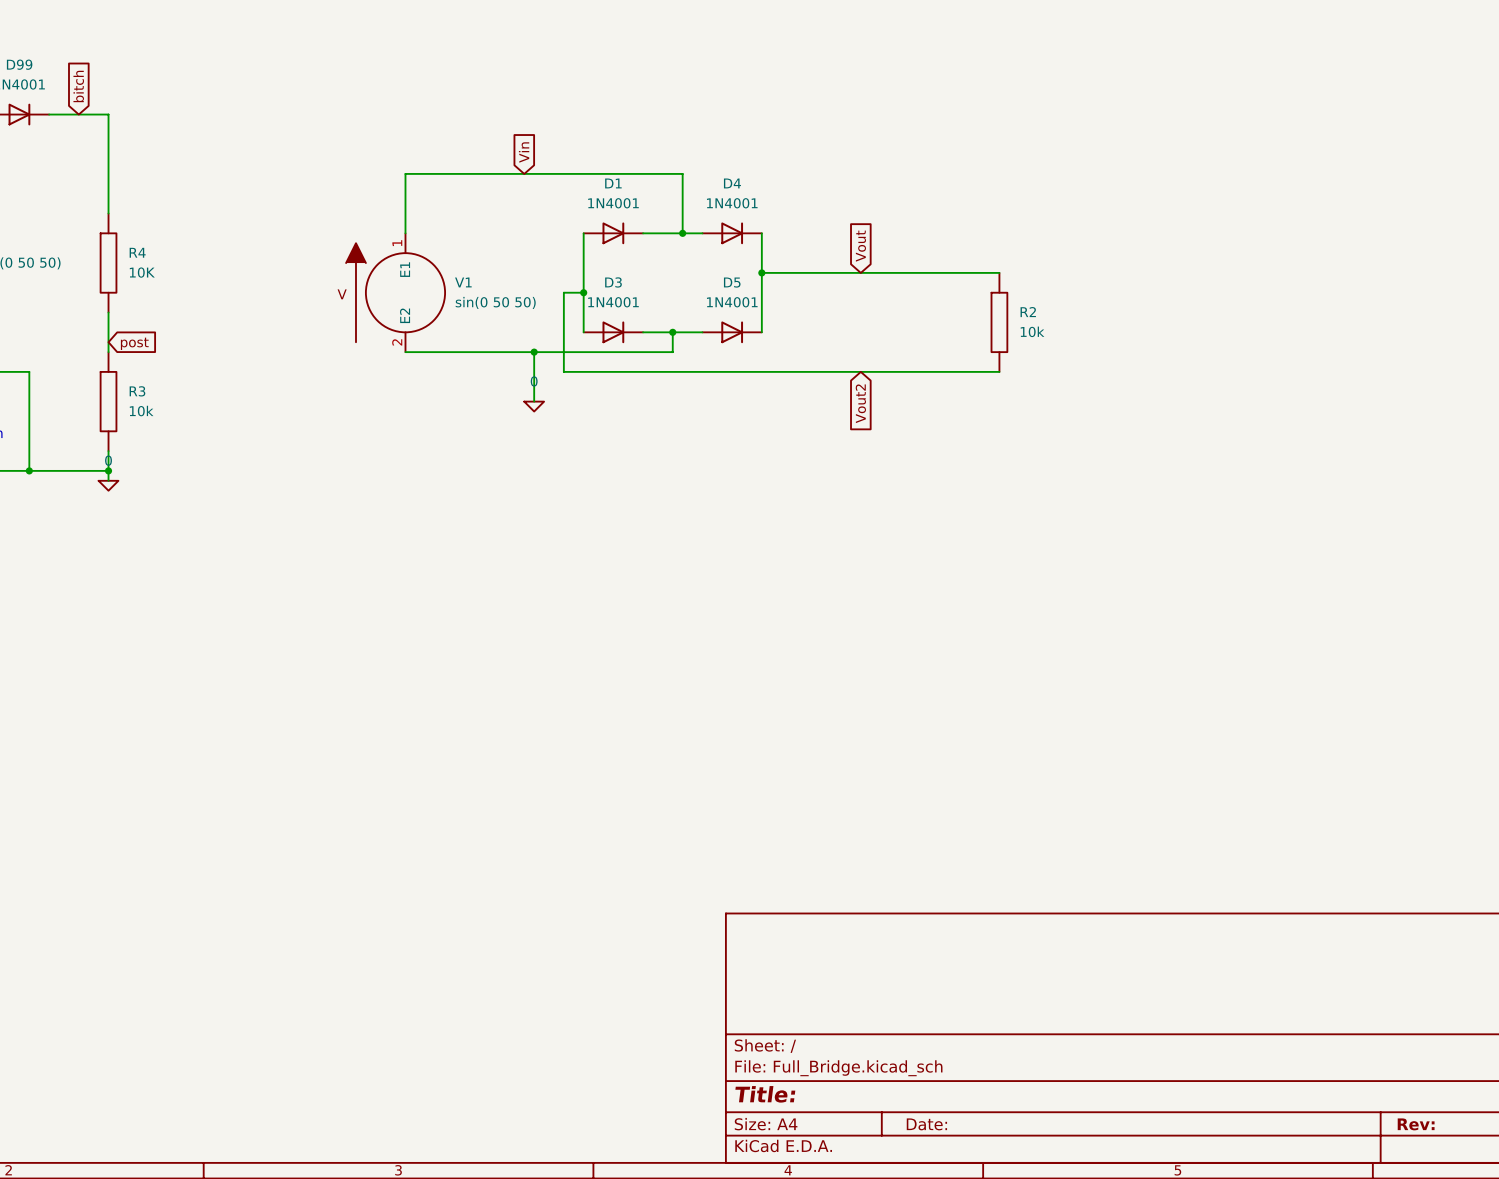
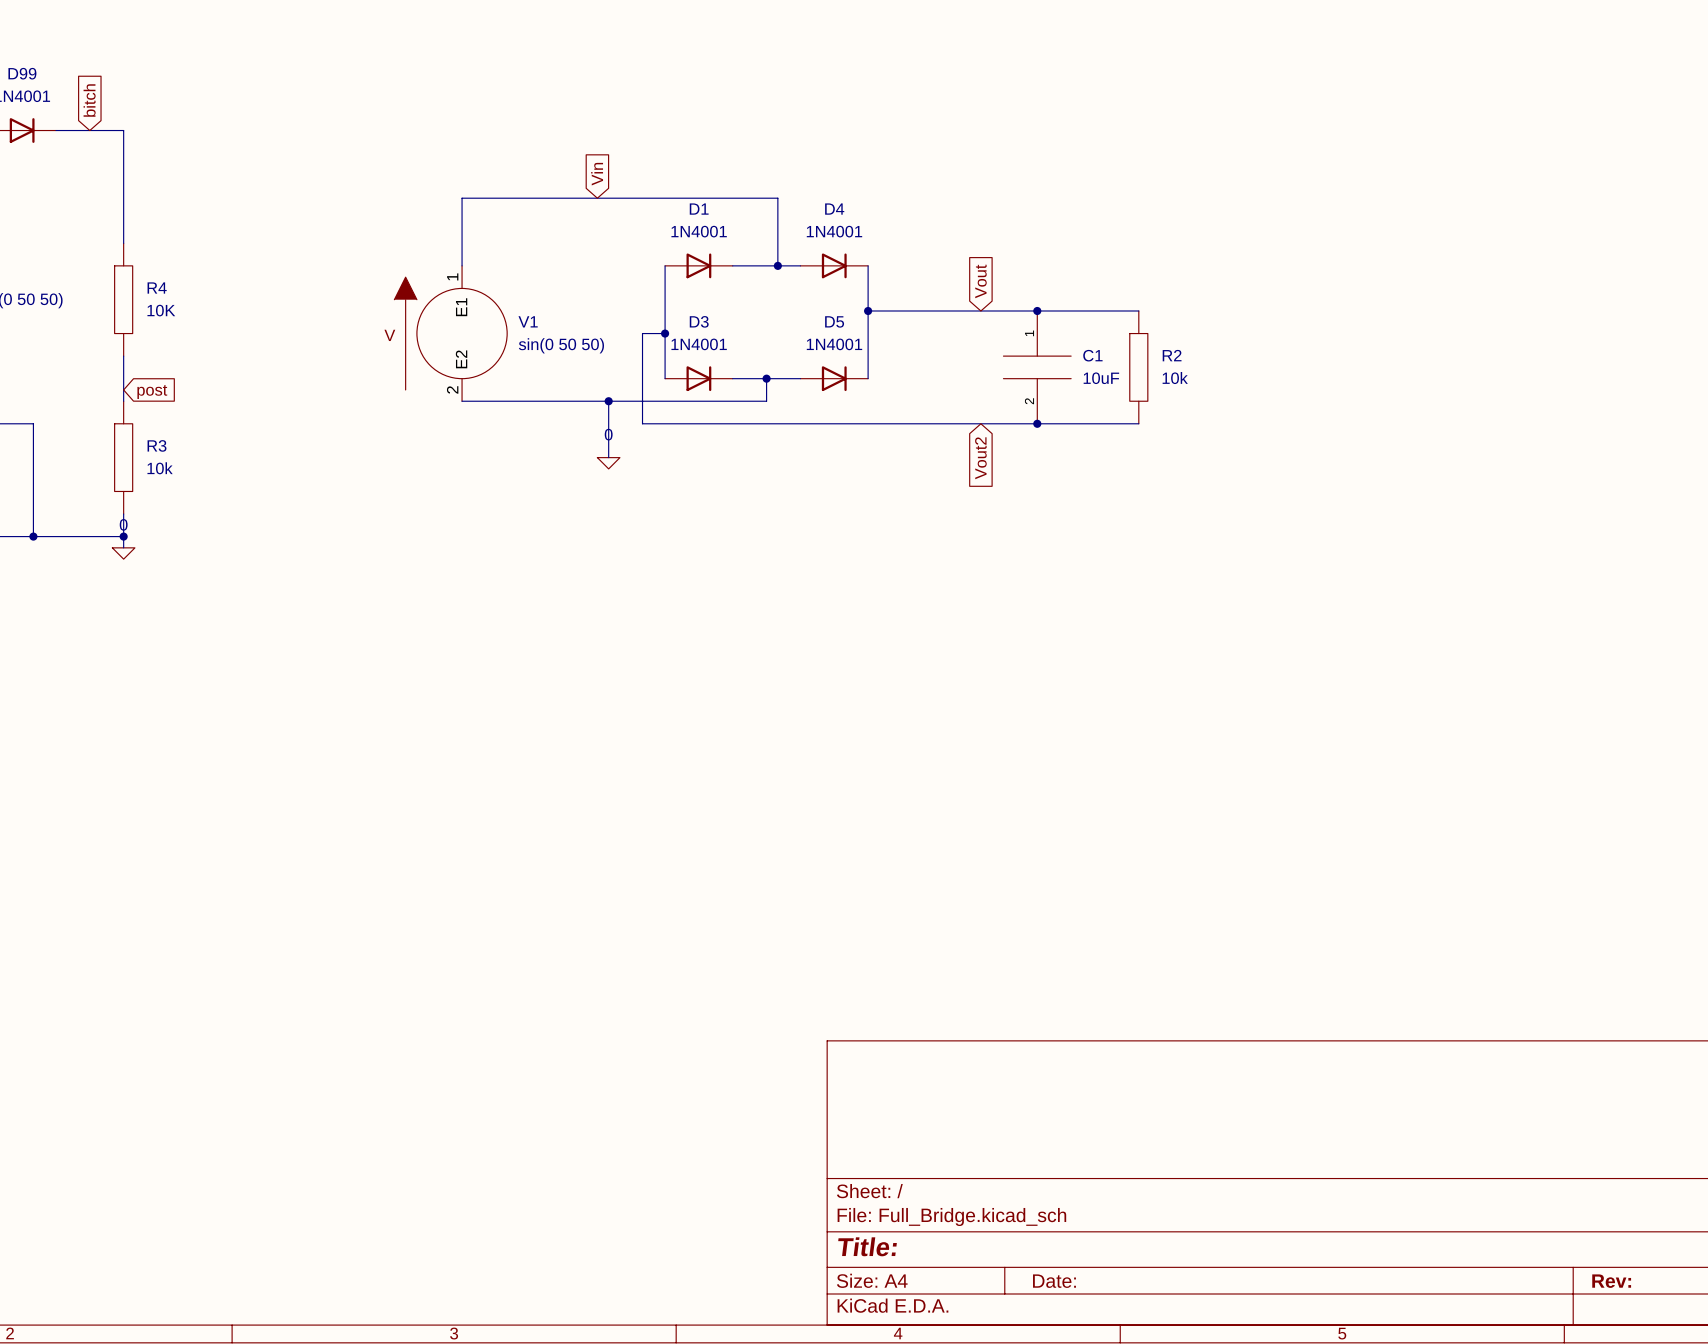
junction: none -> (1037, 310)
C1: none -> 10uF (1037, 367)
junction: none -> (1037, 423)

